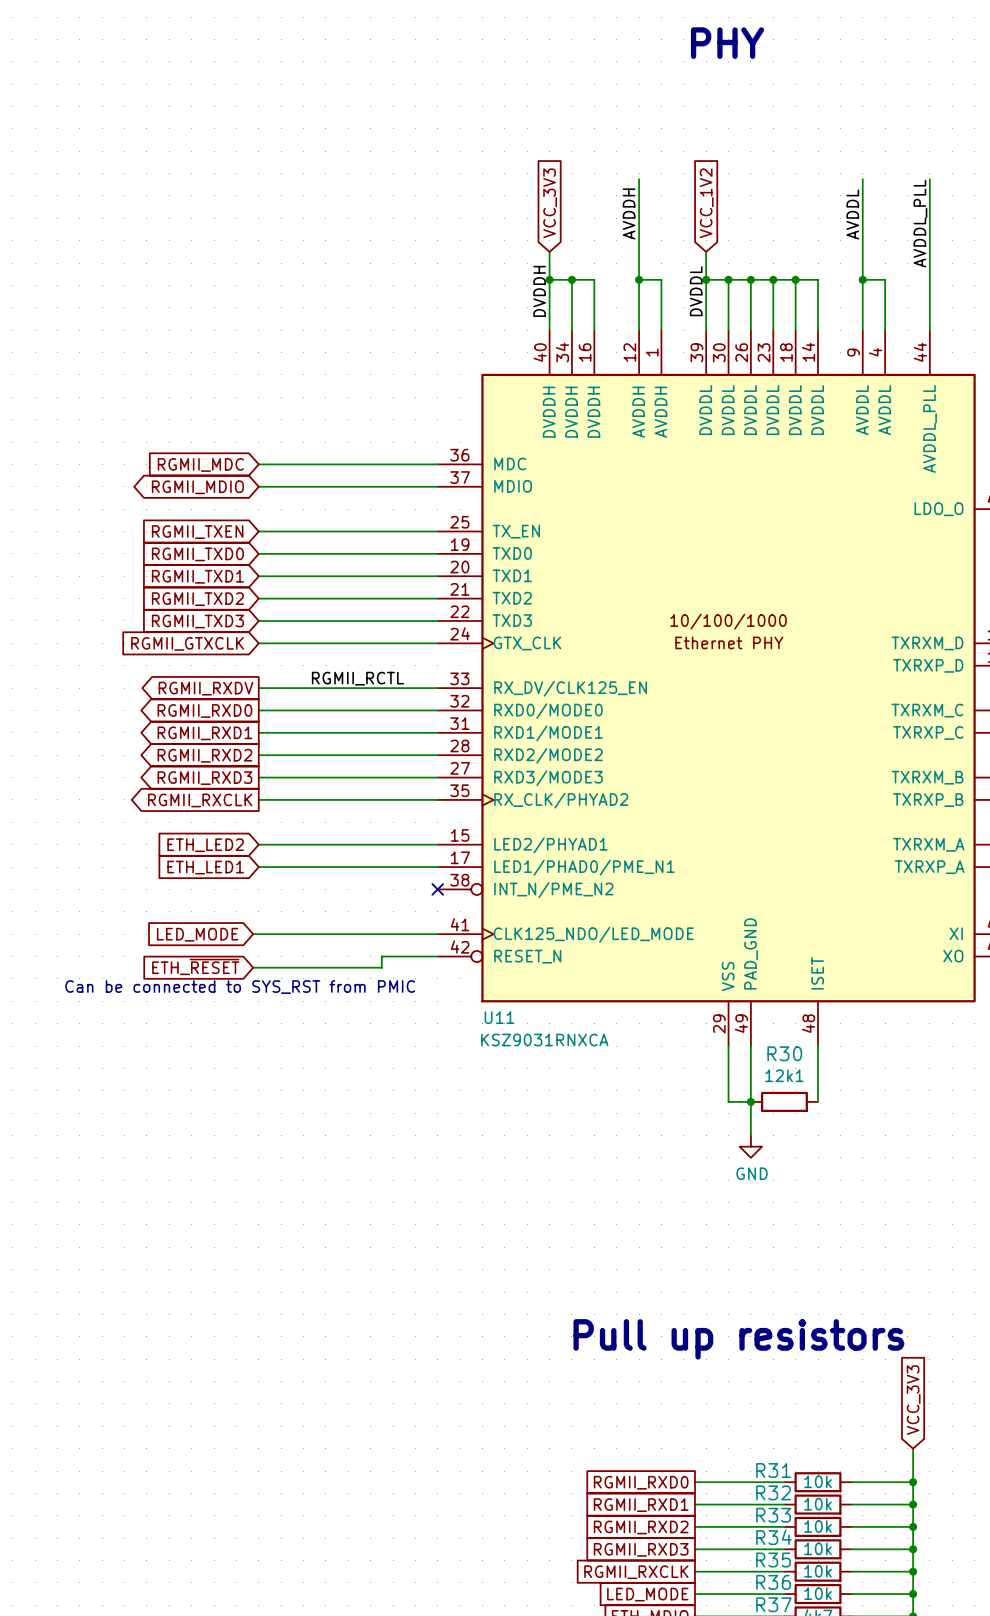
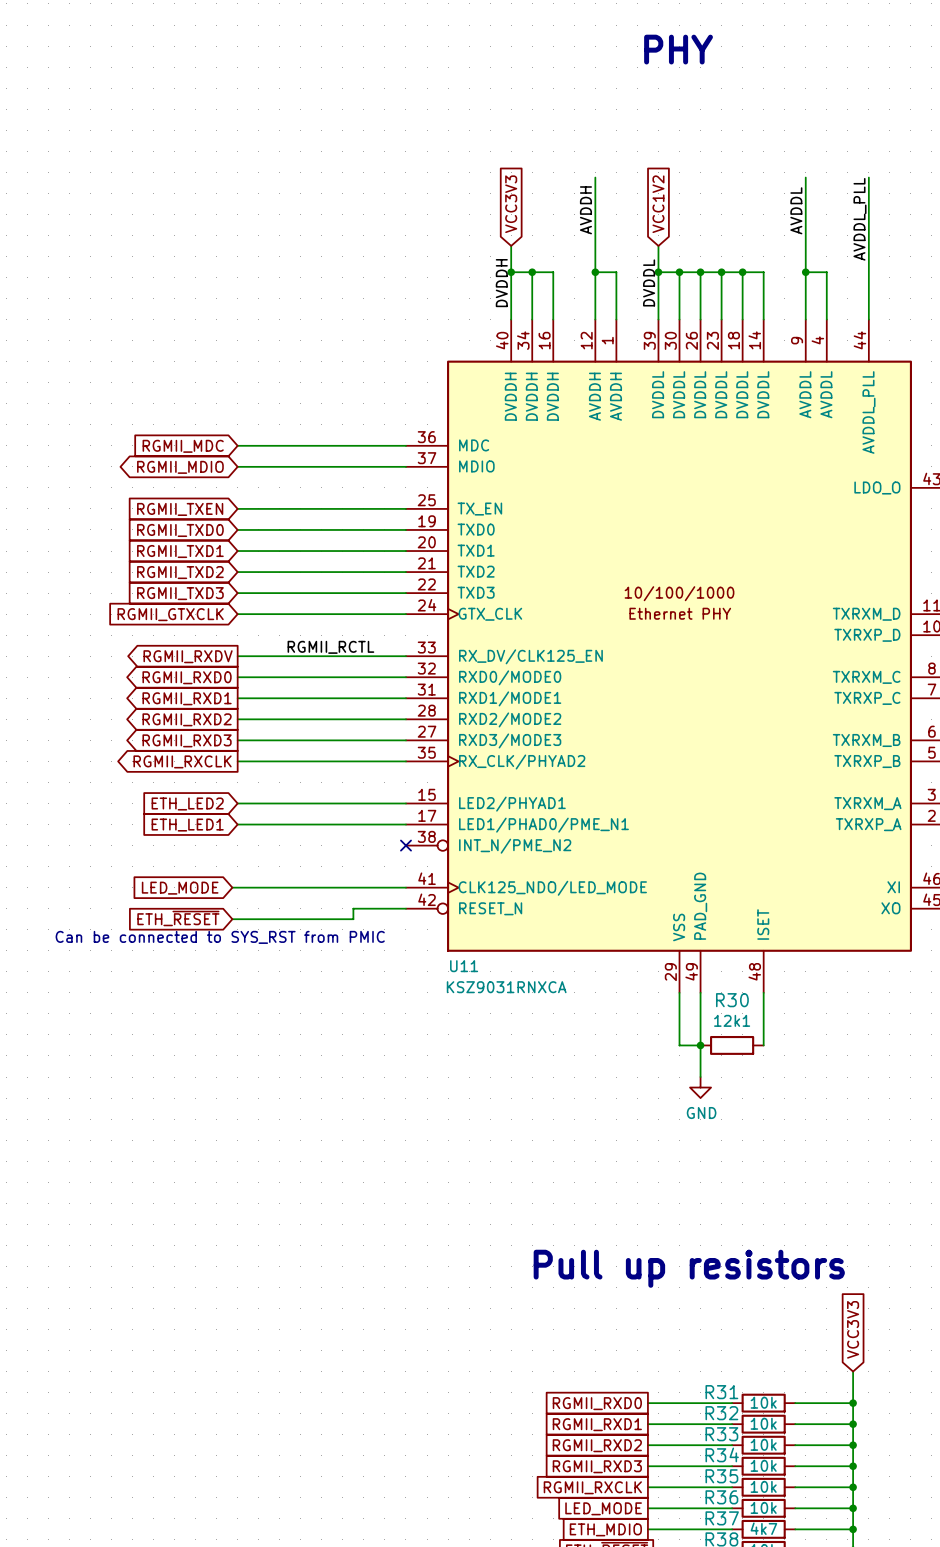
global label: VCC_3V3 (550, 203) -> VCC3V3 (511, 204)
global label: VCC_1V2 (706, 203) -> VCC1V2 (658, 204)
global label: VCC_3V3 (913, 1400) -> VCC3V3 (853, 1329)

